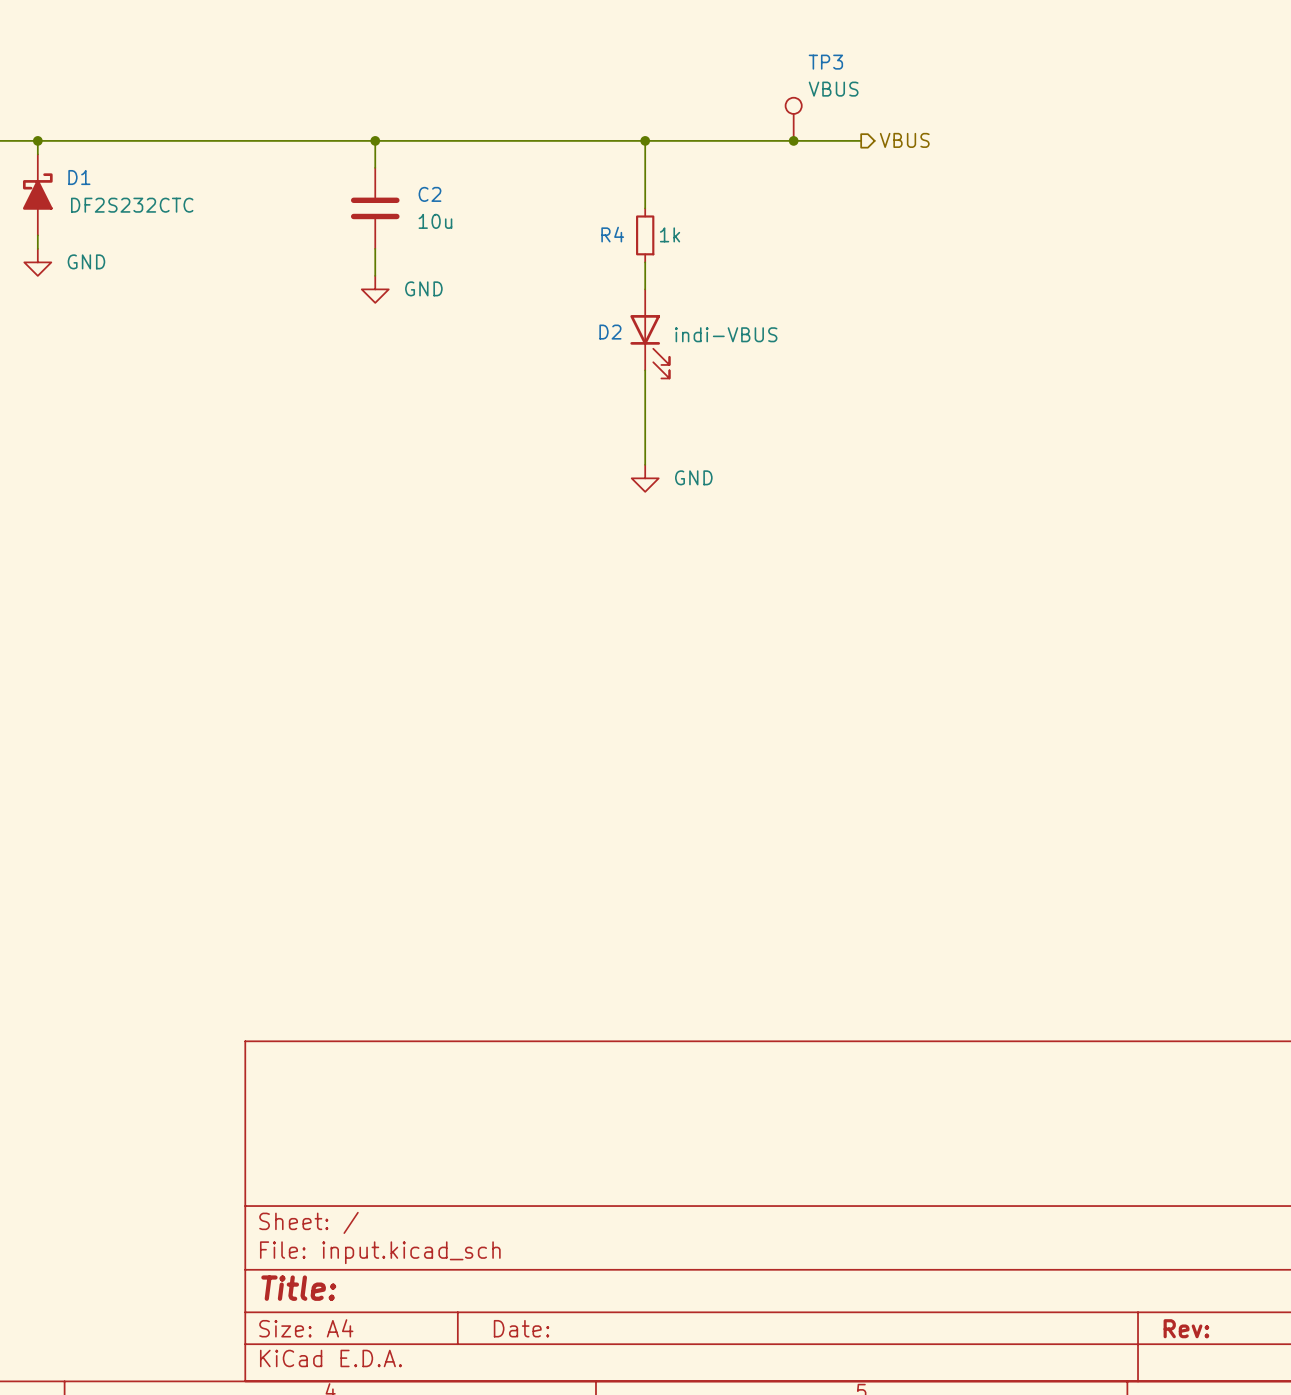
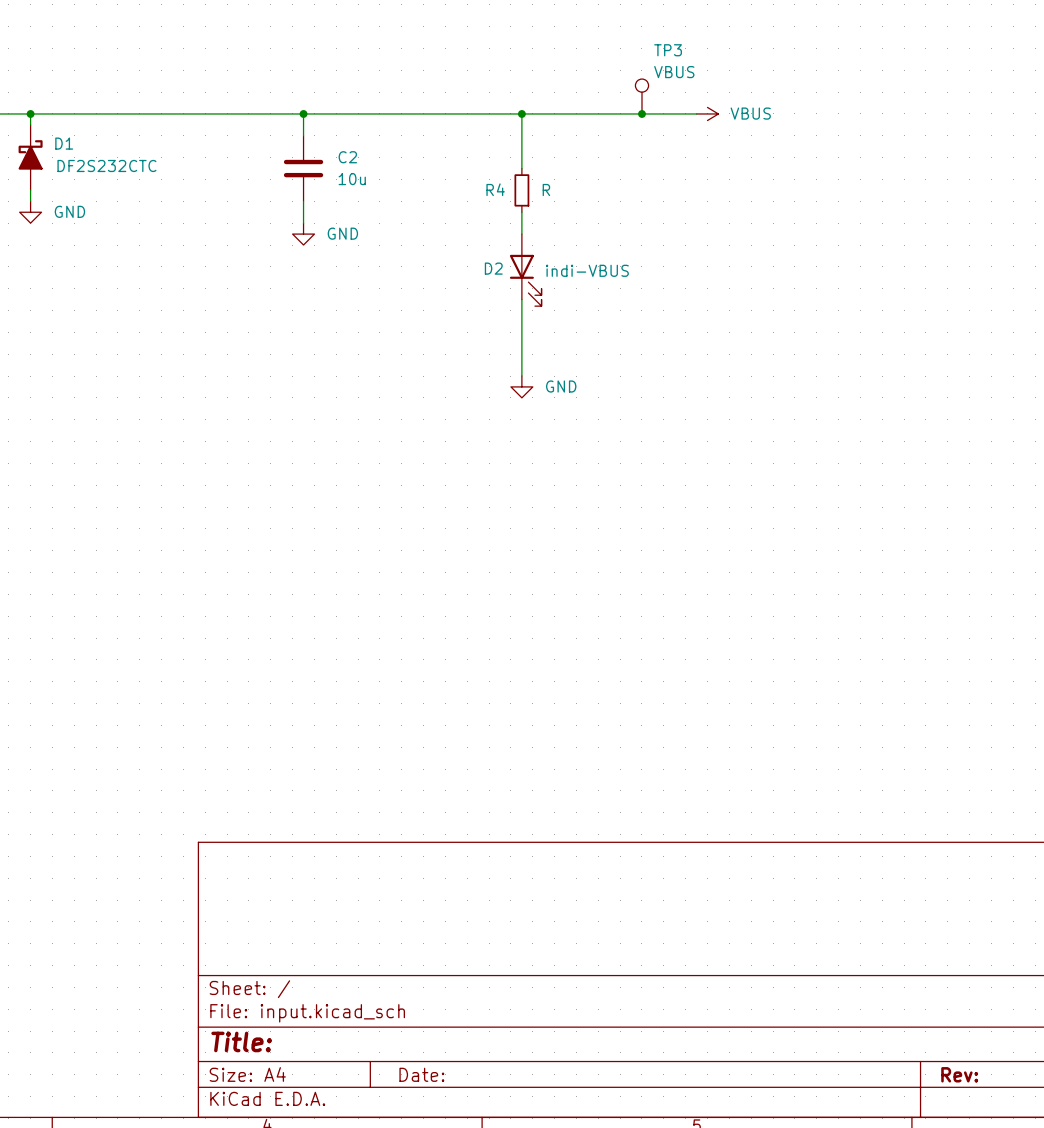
power symbol: none -> VBUS (707, 113)
hierarchical label: VBUS (904, 140) -> none
R4 value: 1k (670, 234) -> R (546, 190)

